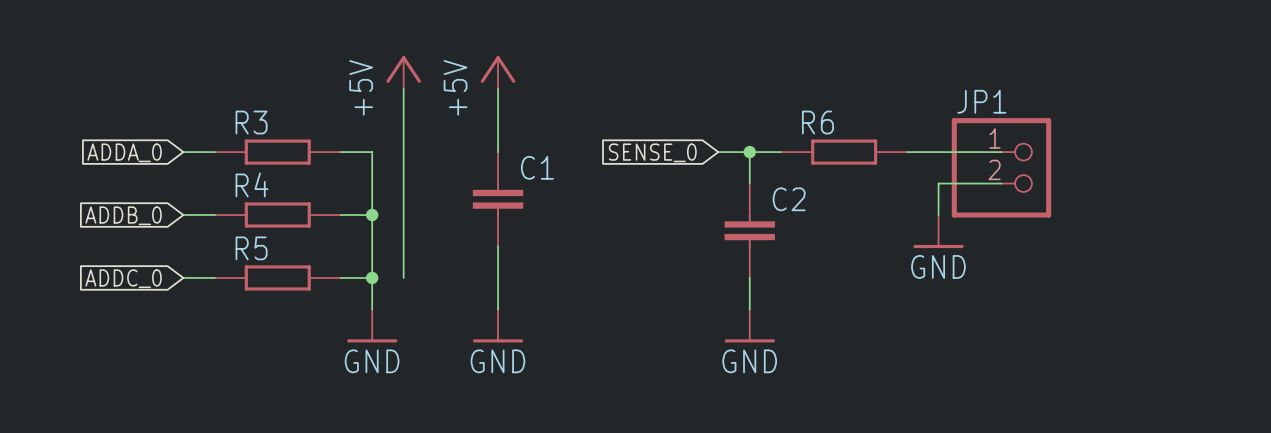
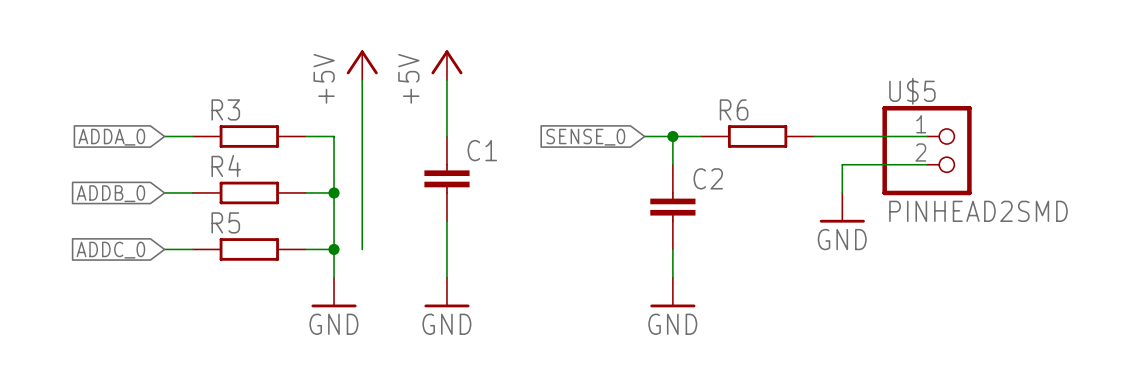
wire: none -> (898, 136) (927, 136)
JP1: (1001, 167) -> none
U$5: none -> PINHEAD2SMD (927, 150)
wire: none -> (898, 164) (927, 164)

